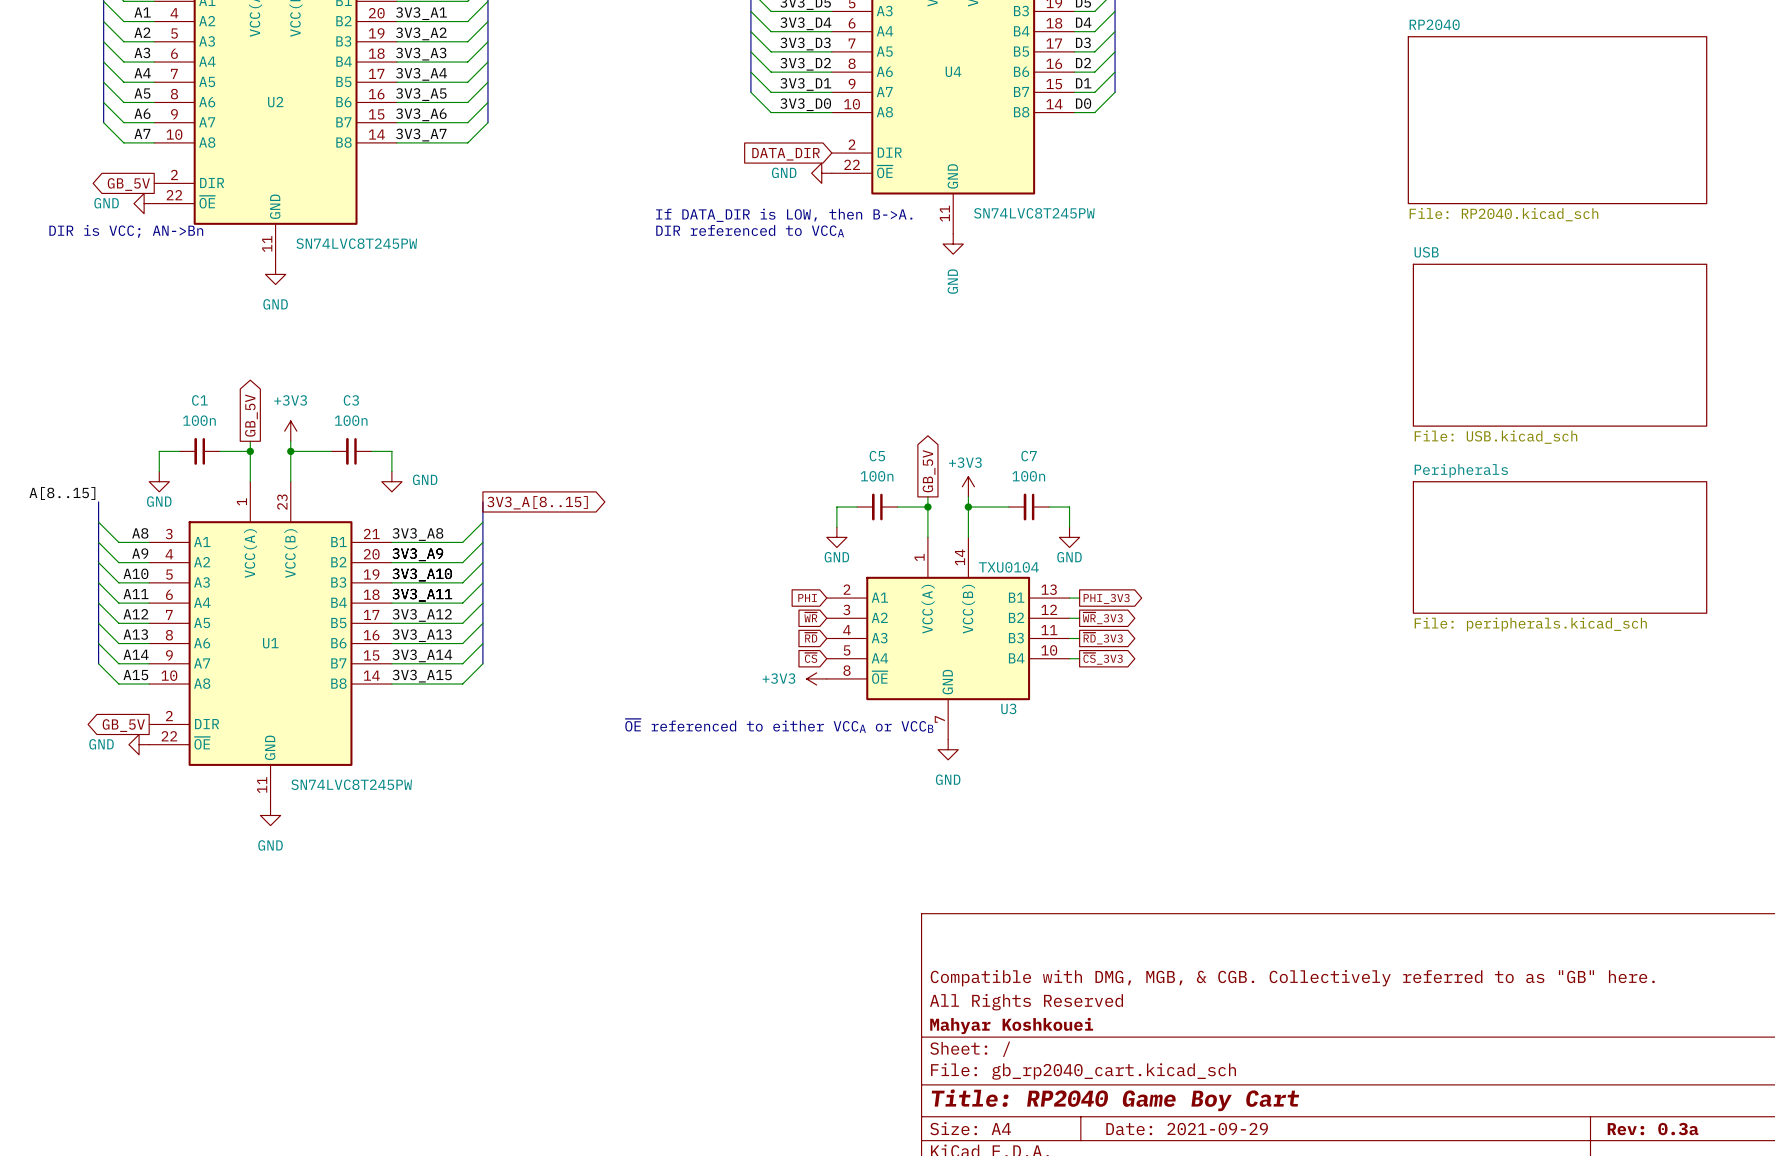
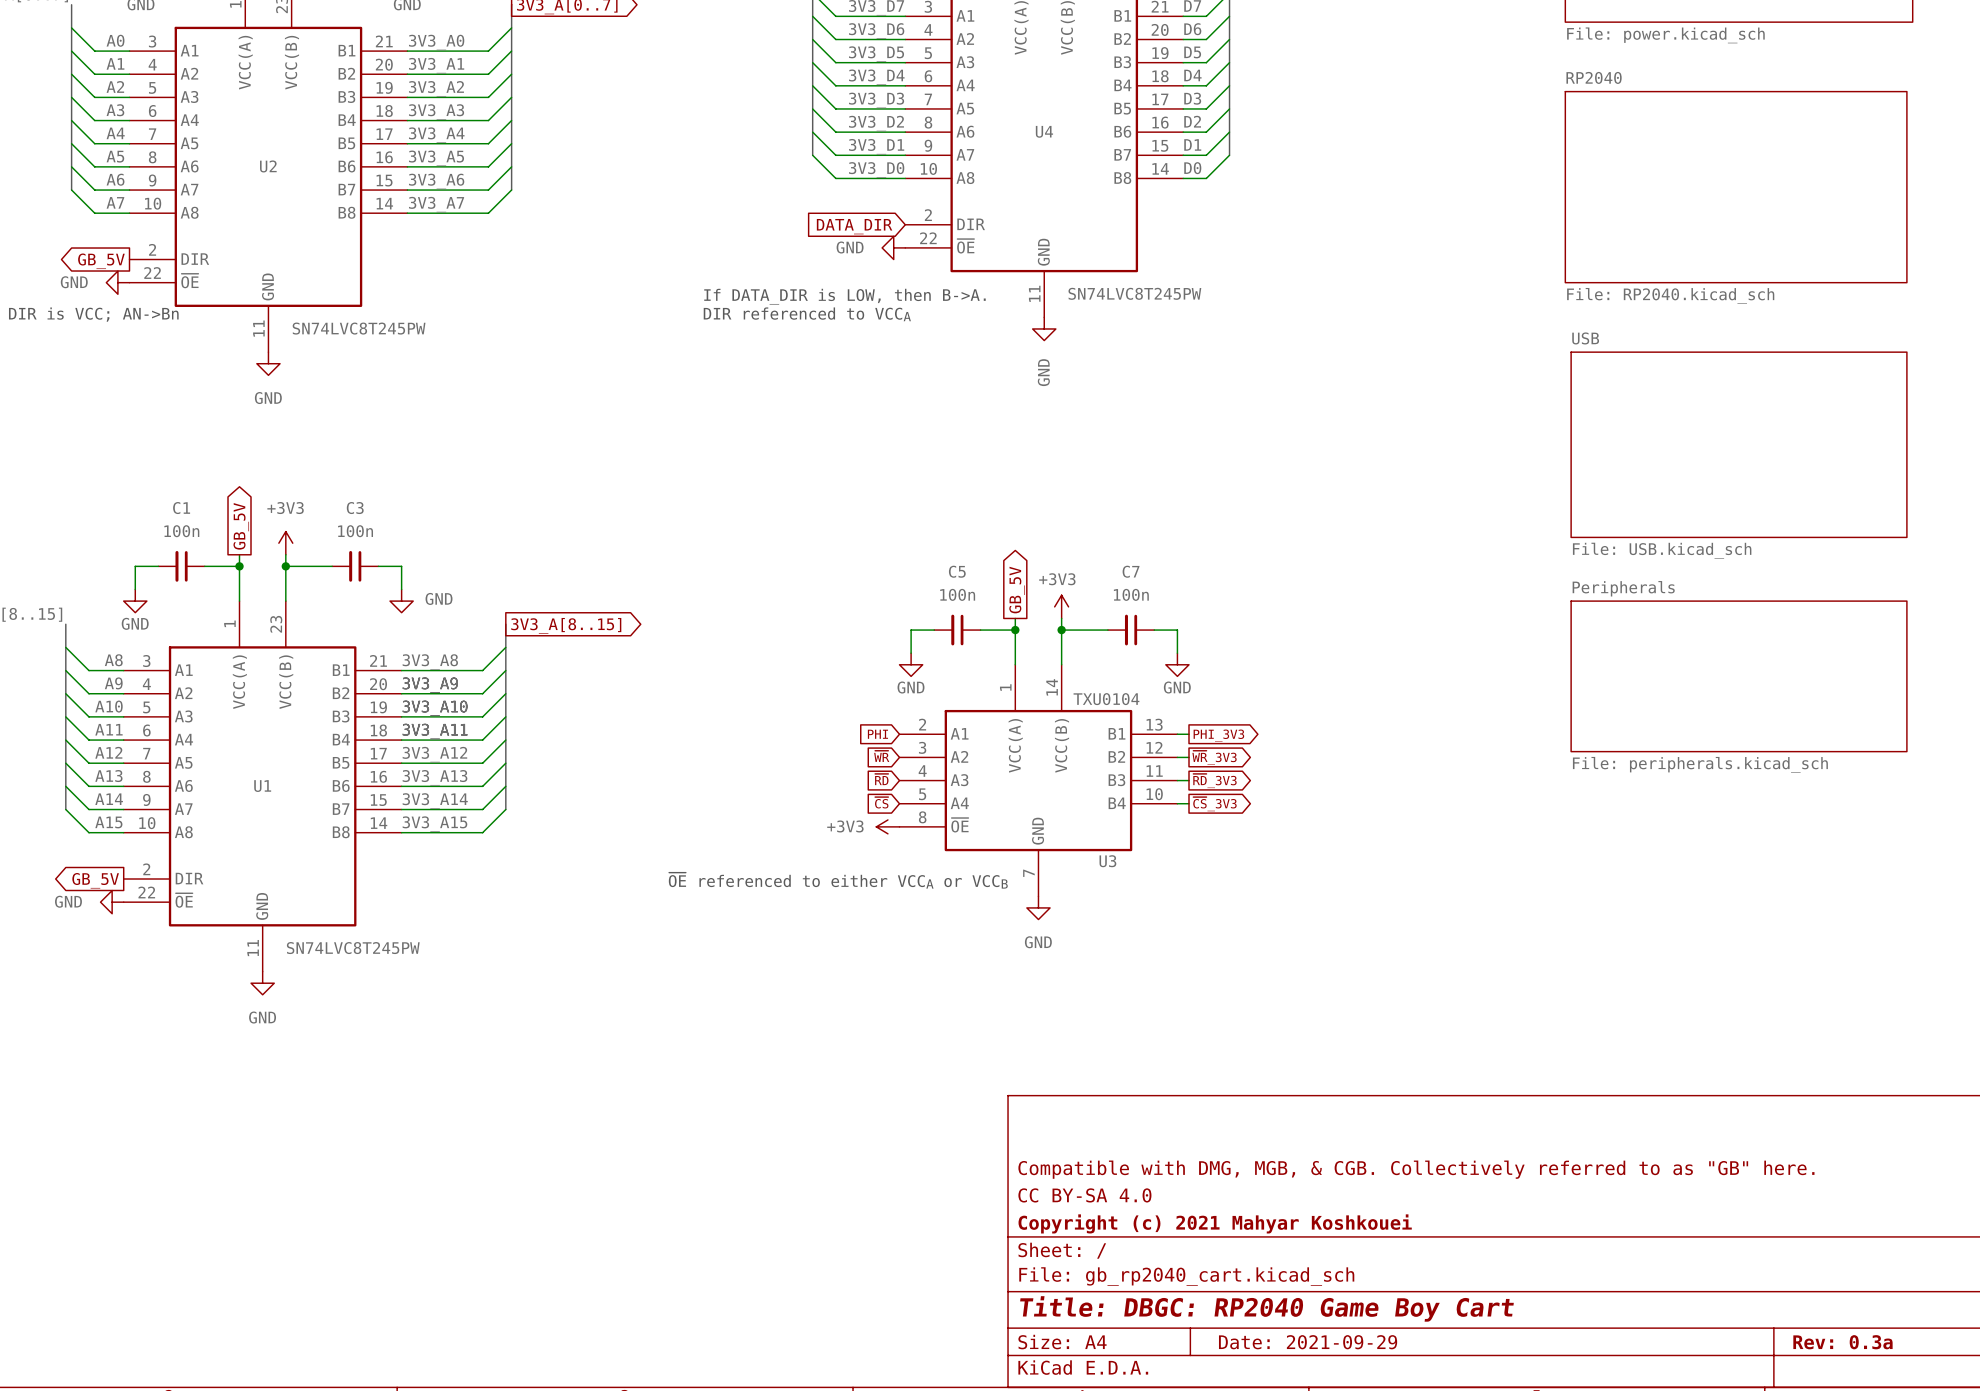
title block: All Rights Reserved (1026, 1002) -> CC BY-SA 4.0 (1084, 1195)
title block: Mahyar Koshkouei (1011, 1025) -> Copyright (c) 2021 Mahyar Koshkouei (1215, 1223)
title block: Title: RP2040 Game Boy Cart (1115, 1100) -> Title: DBGC: RP2040 Game Boy Cart (1266, 1308)

